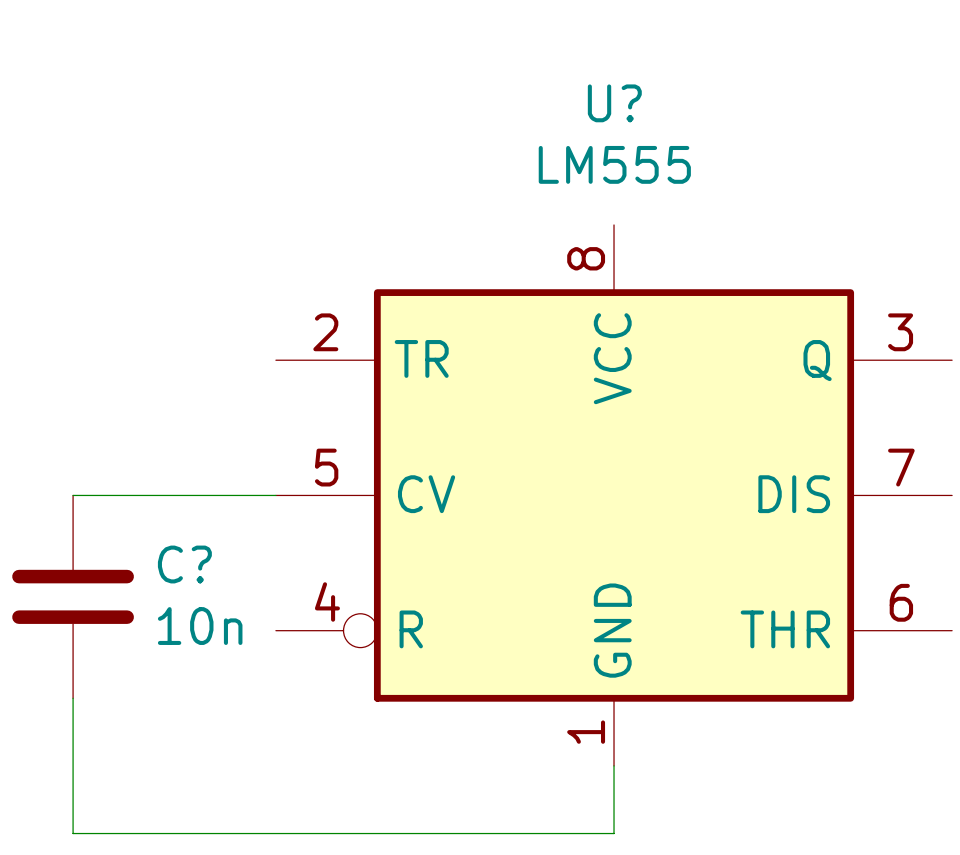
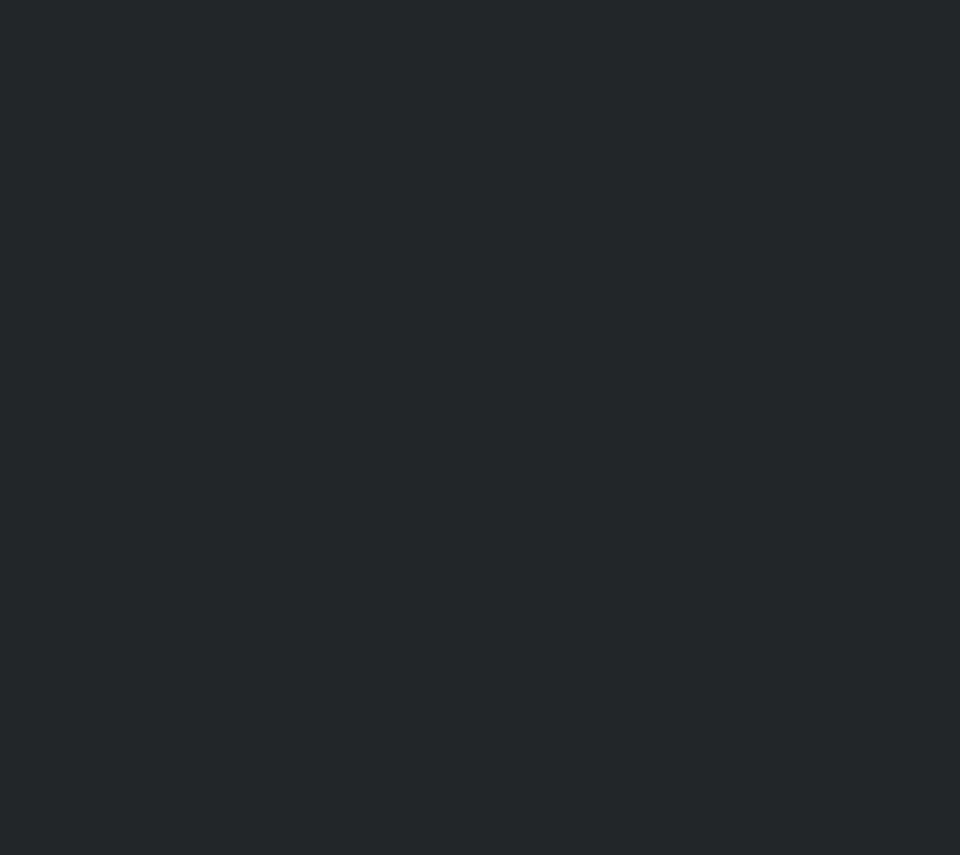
wire: (73, 495) (275, 495) -> none
U?: LM555 (614, 495) -> none
C?: 10n (73, 596) -> none
wire: (73, 698) (73, 833) (614, 833) (614, 765) -> none

